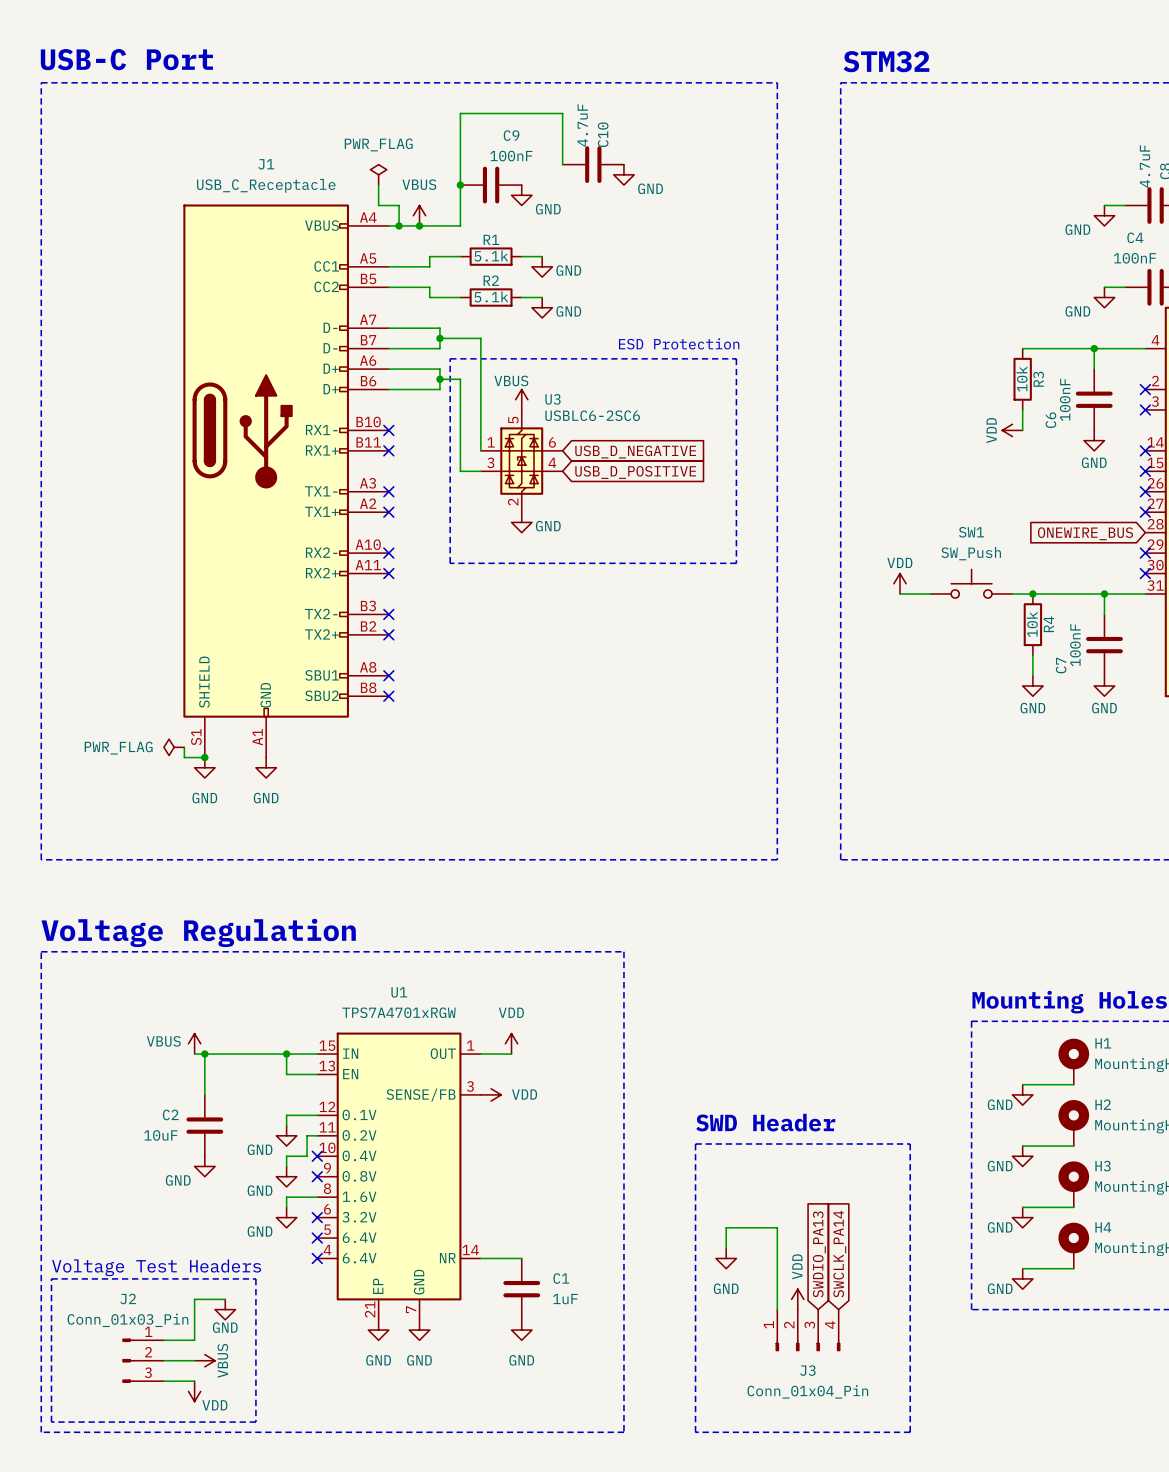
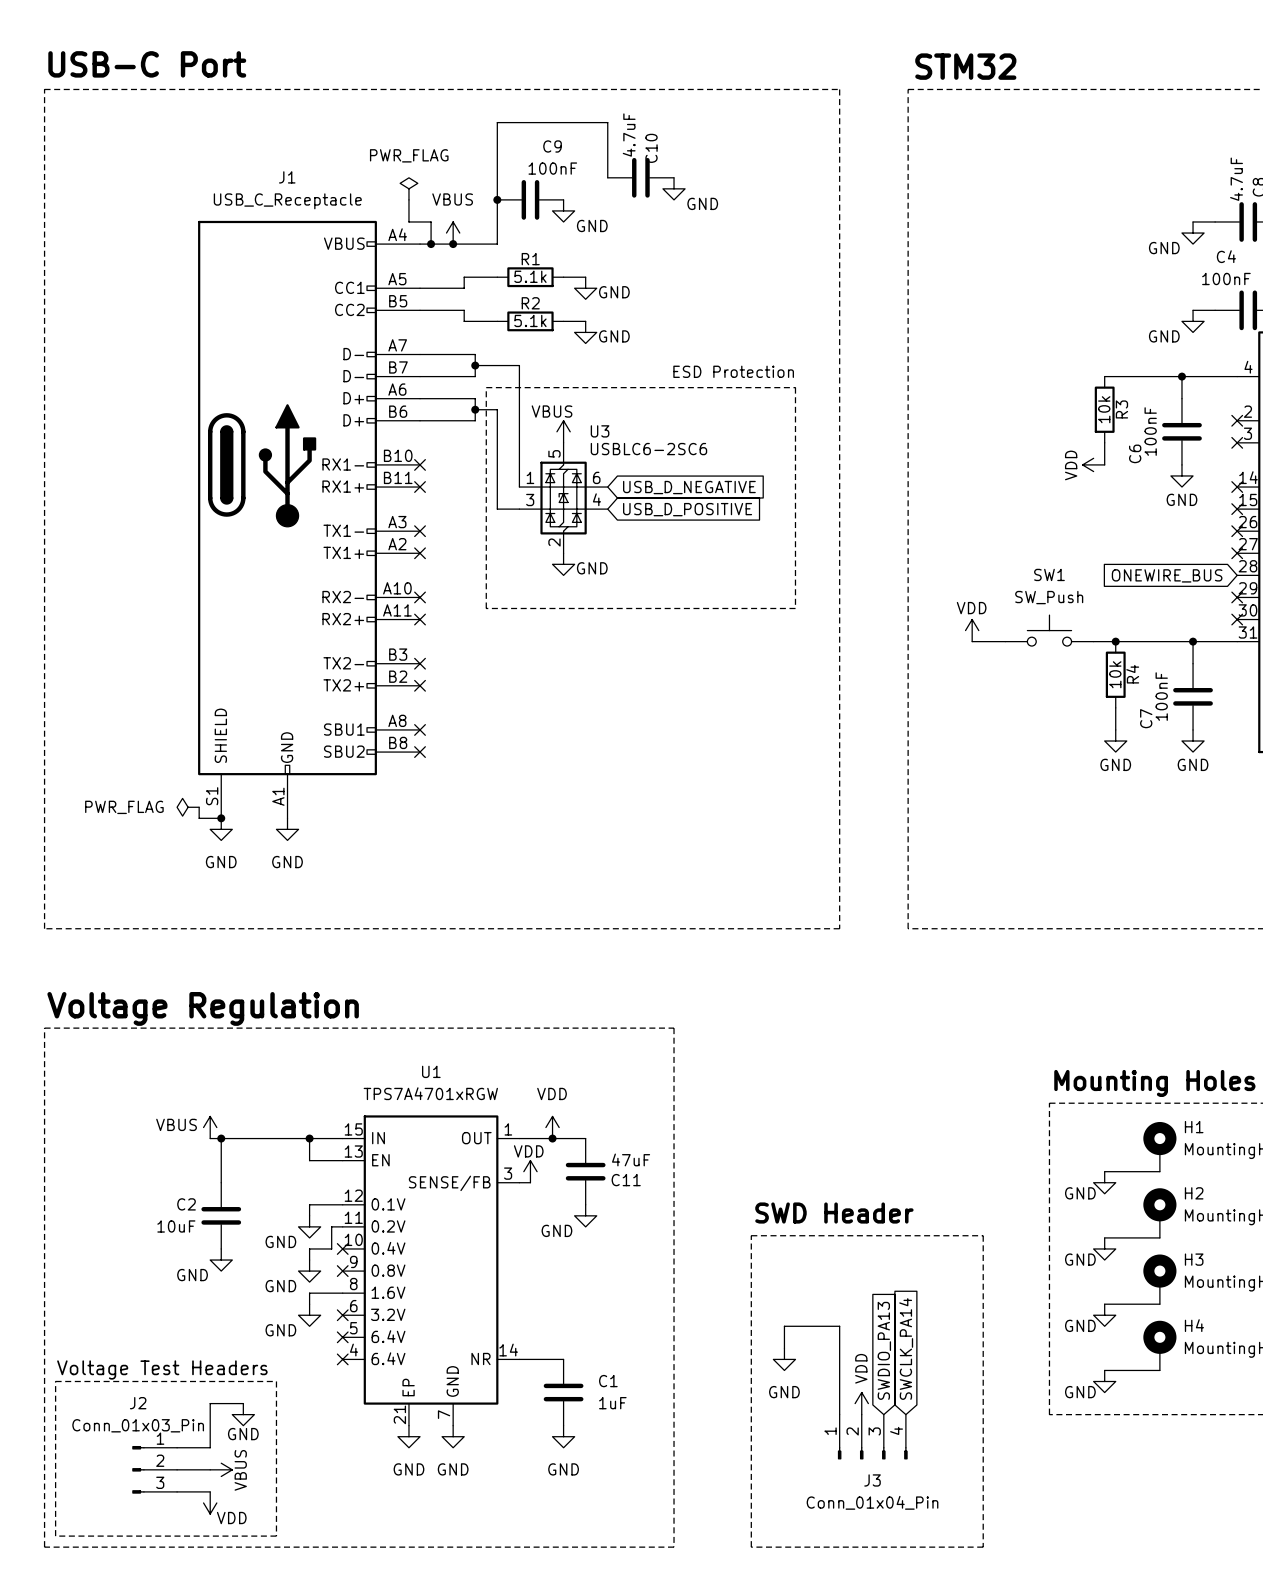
wire: none -> (552, 1138) (585, 1138)
junction: none -> (552, 1138)
C11: none -> 47uF (585, 1171)
power symbol rotation: 0° (491, 1094) -> 90° counterclockwise (530, 1171)
power symbol text position: VDD (524, 1094) -> VDD (528, 1151)
power symbol: none -> GND (585, 1215)

